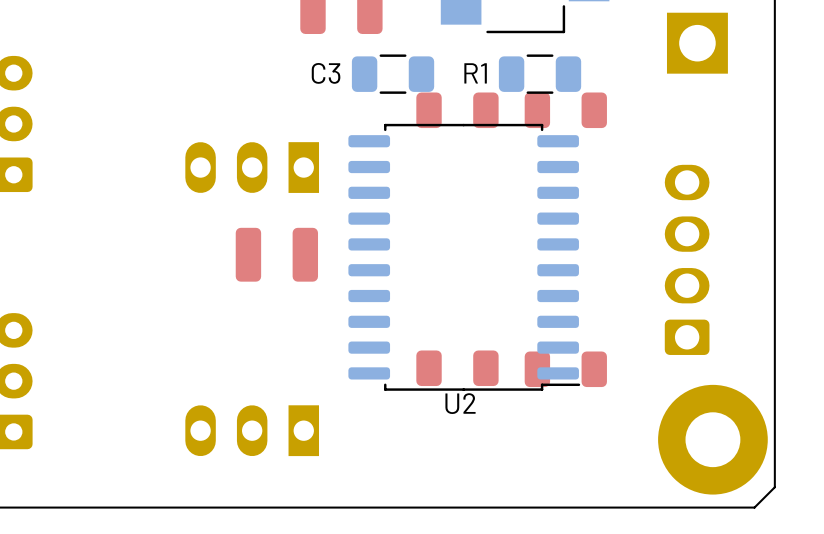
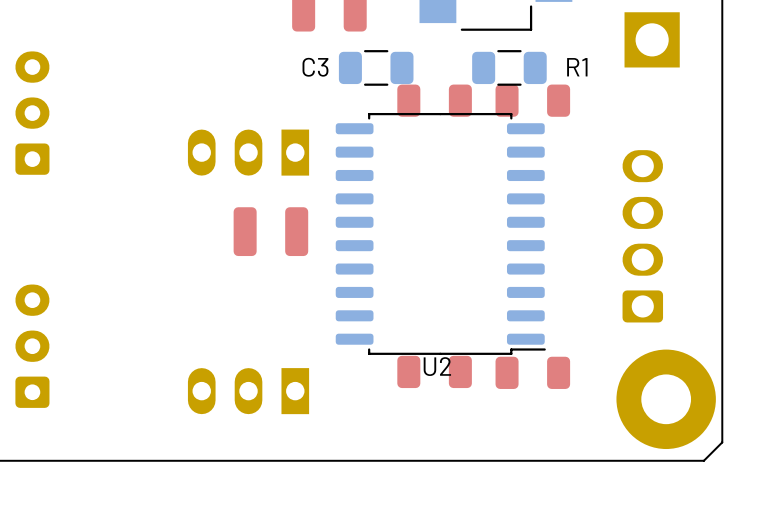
R1 name position: R1 (475, 73) -> R1 (577, 67)
part position: (457, 368) -> (434, 371)
part position: (565, 369) -> (532, 372)

